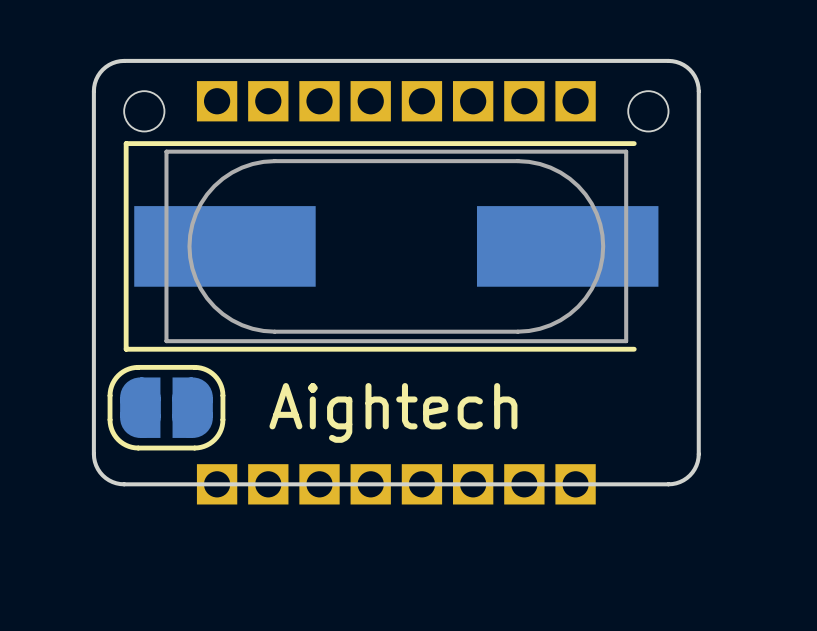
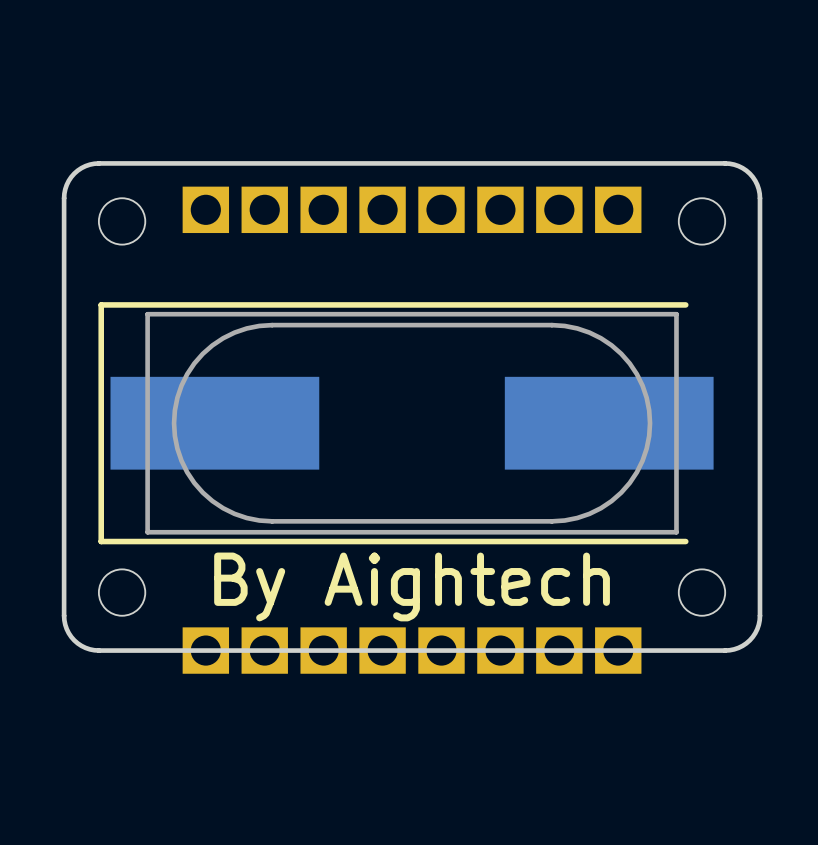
part position: (391, 246) -> (406, 423)
part: (166, 407) -> none
round board edge: none -> [98, 568, 147, 617]
text: Aightech (393, 412) -> By Aightech (412, 586)
round board edge: none -> [677, 568, 727, 617]

